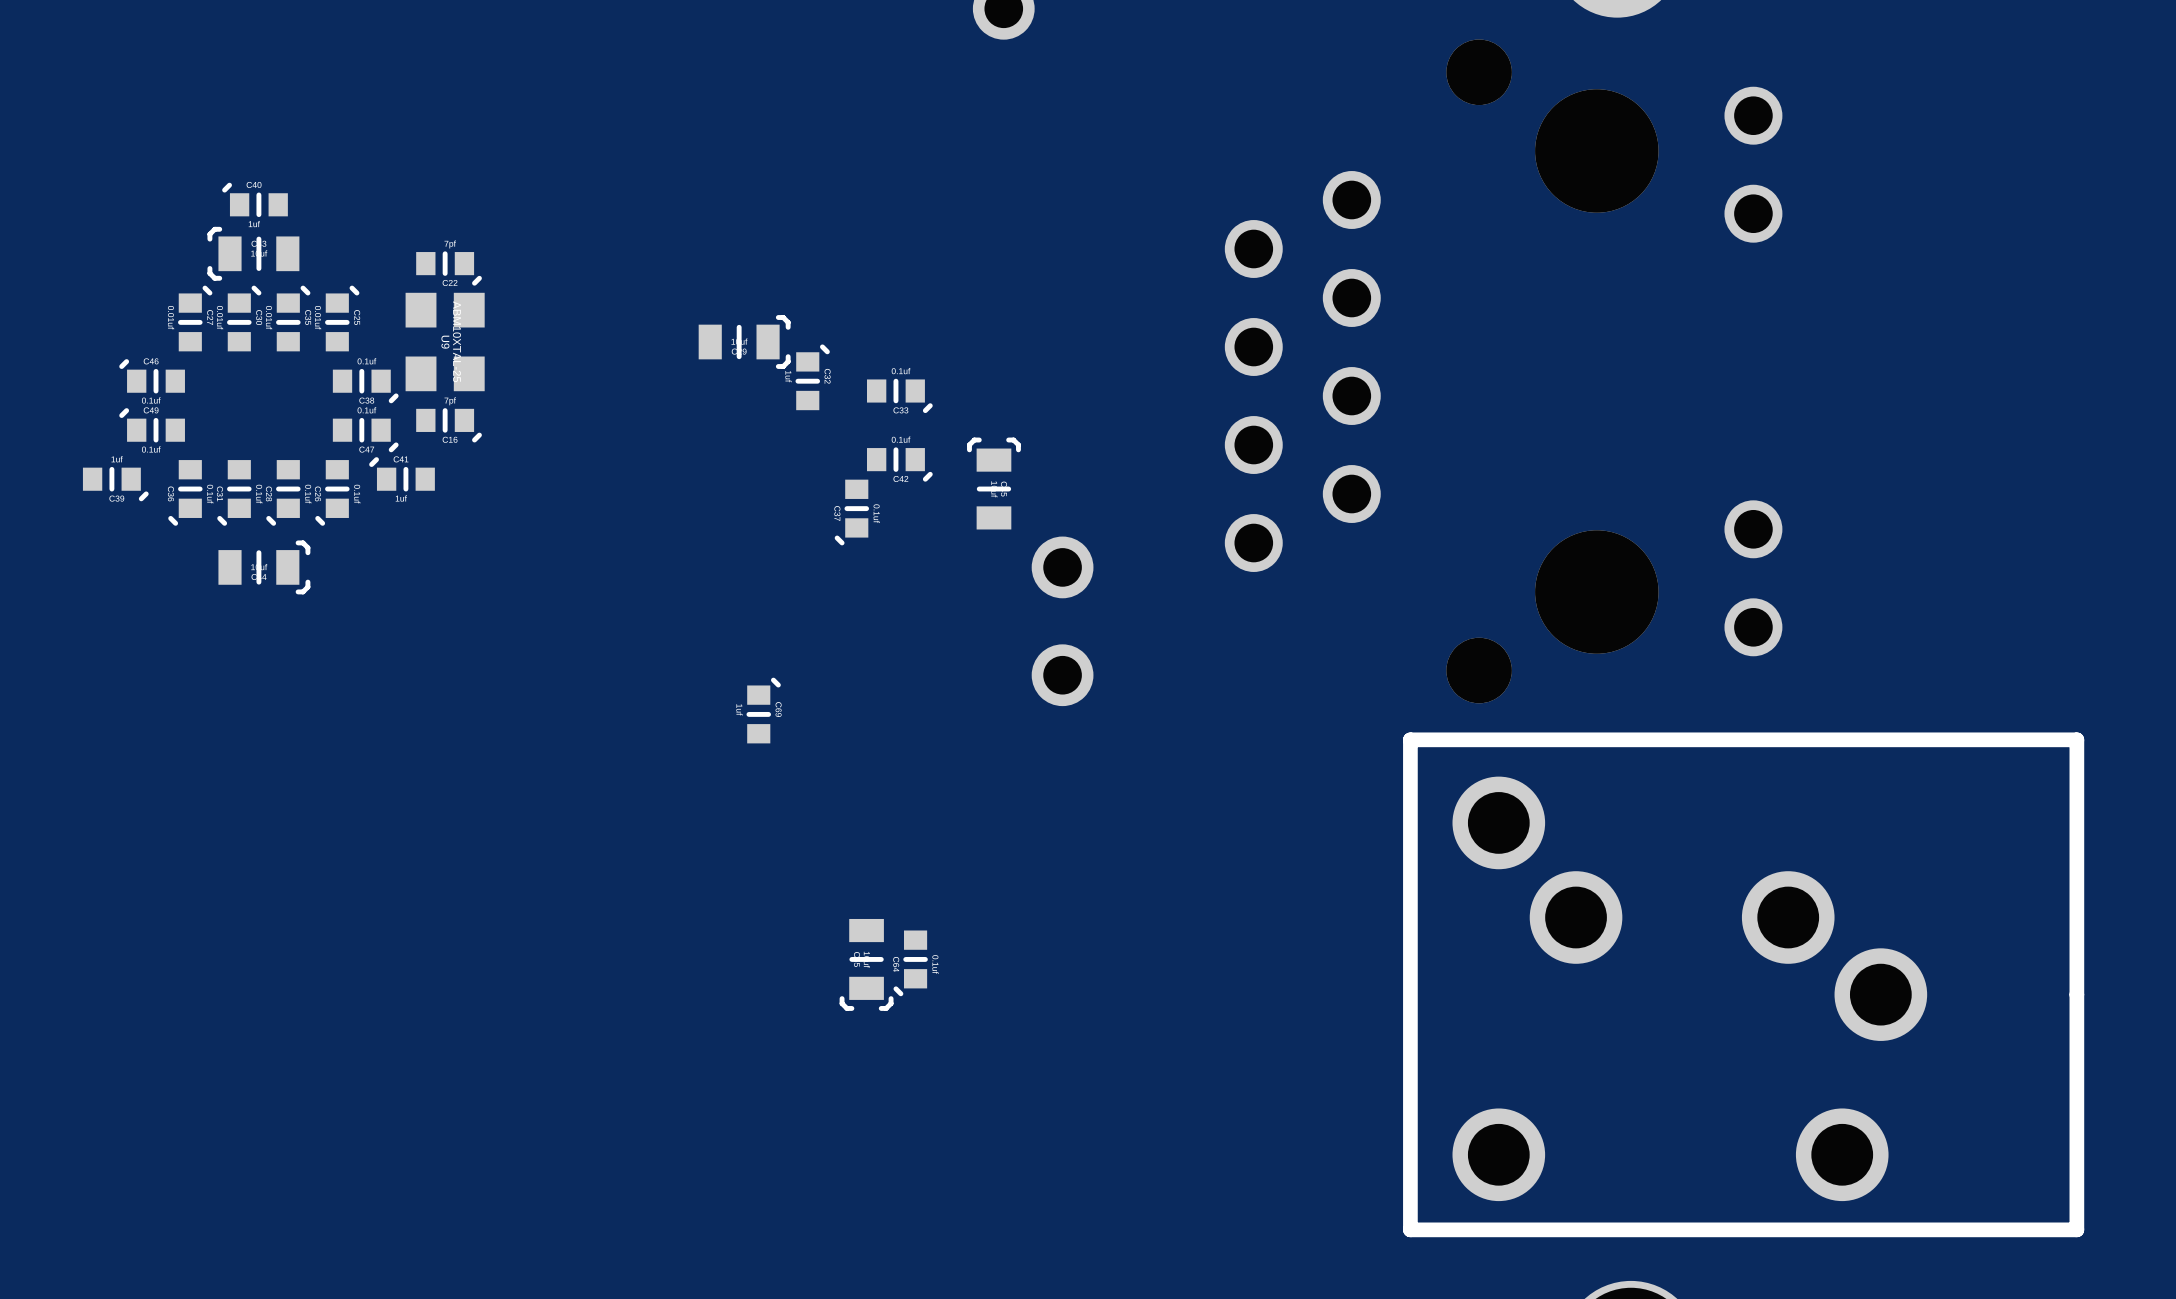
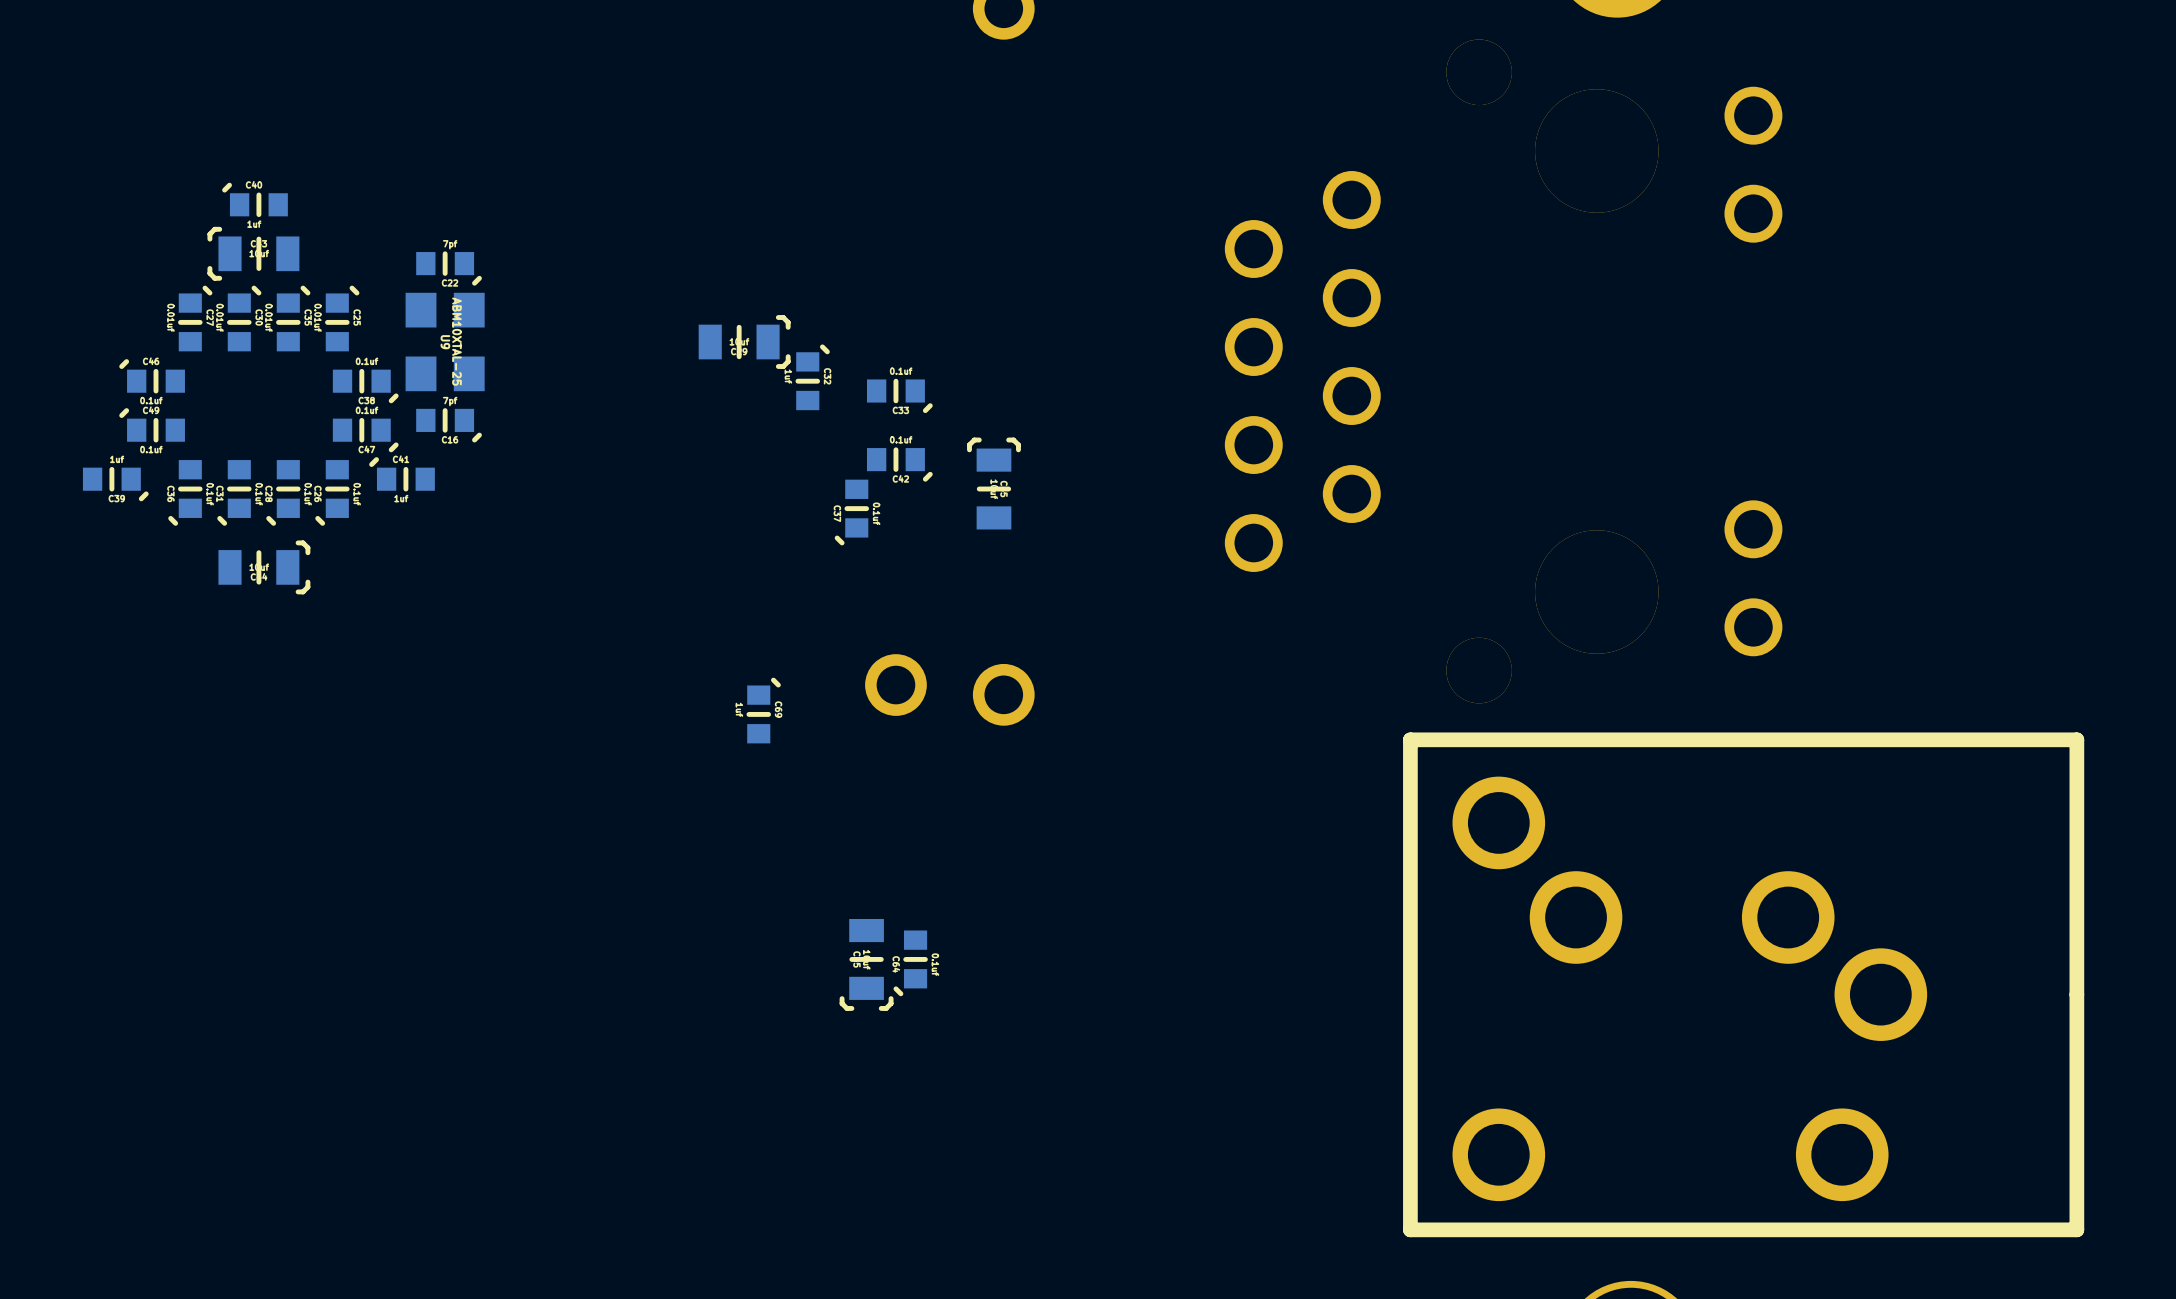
part: (1062, 567) -> none
part position: (1062, 675) -> (1003, 694)
part: none -> (895, 685)

